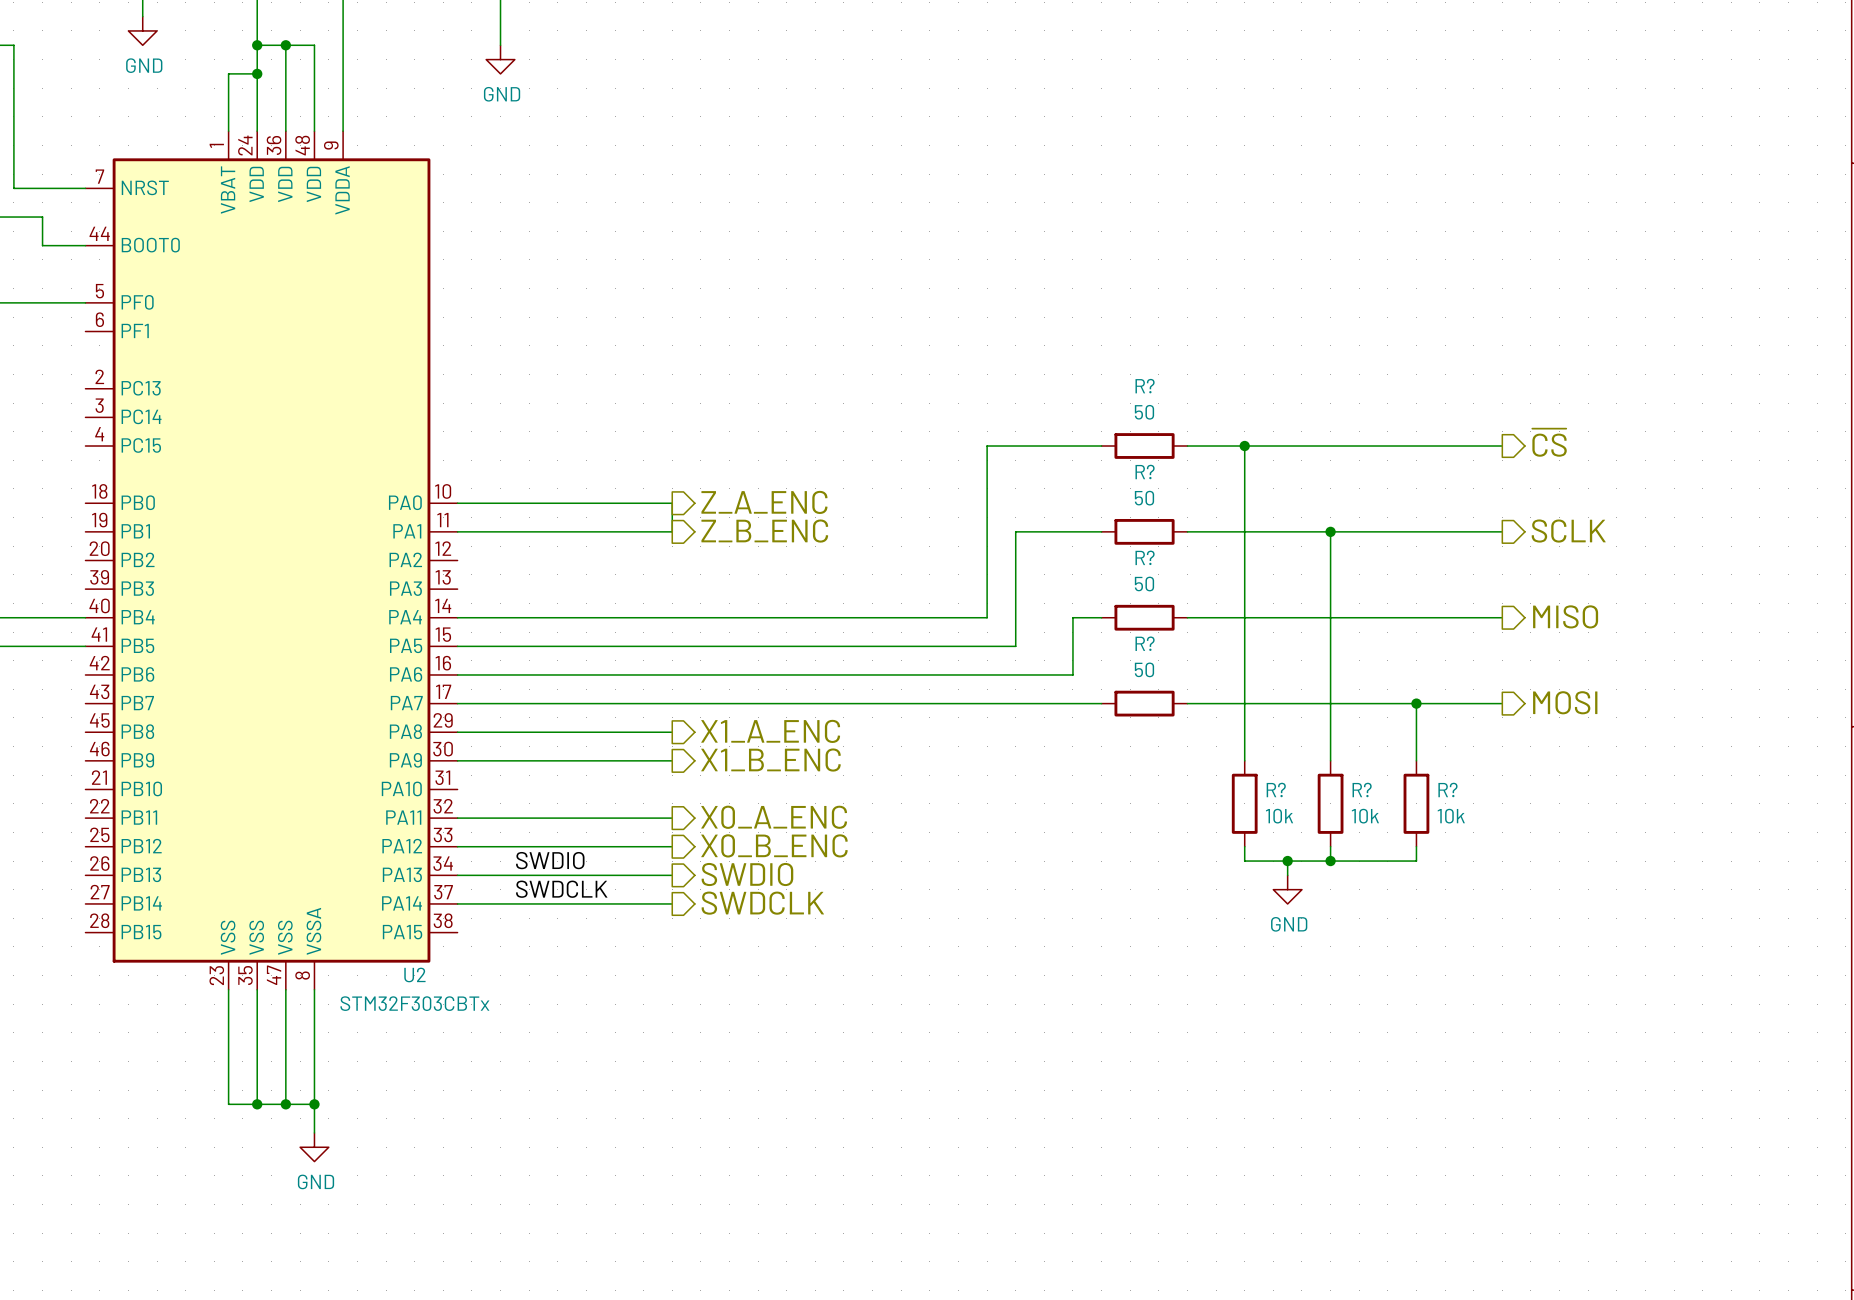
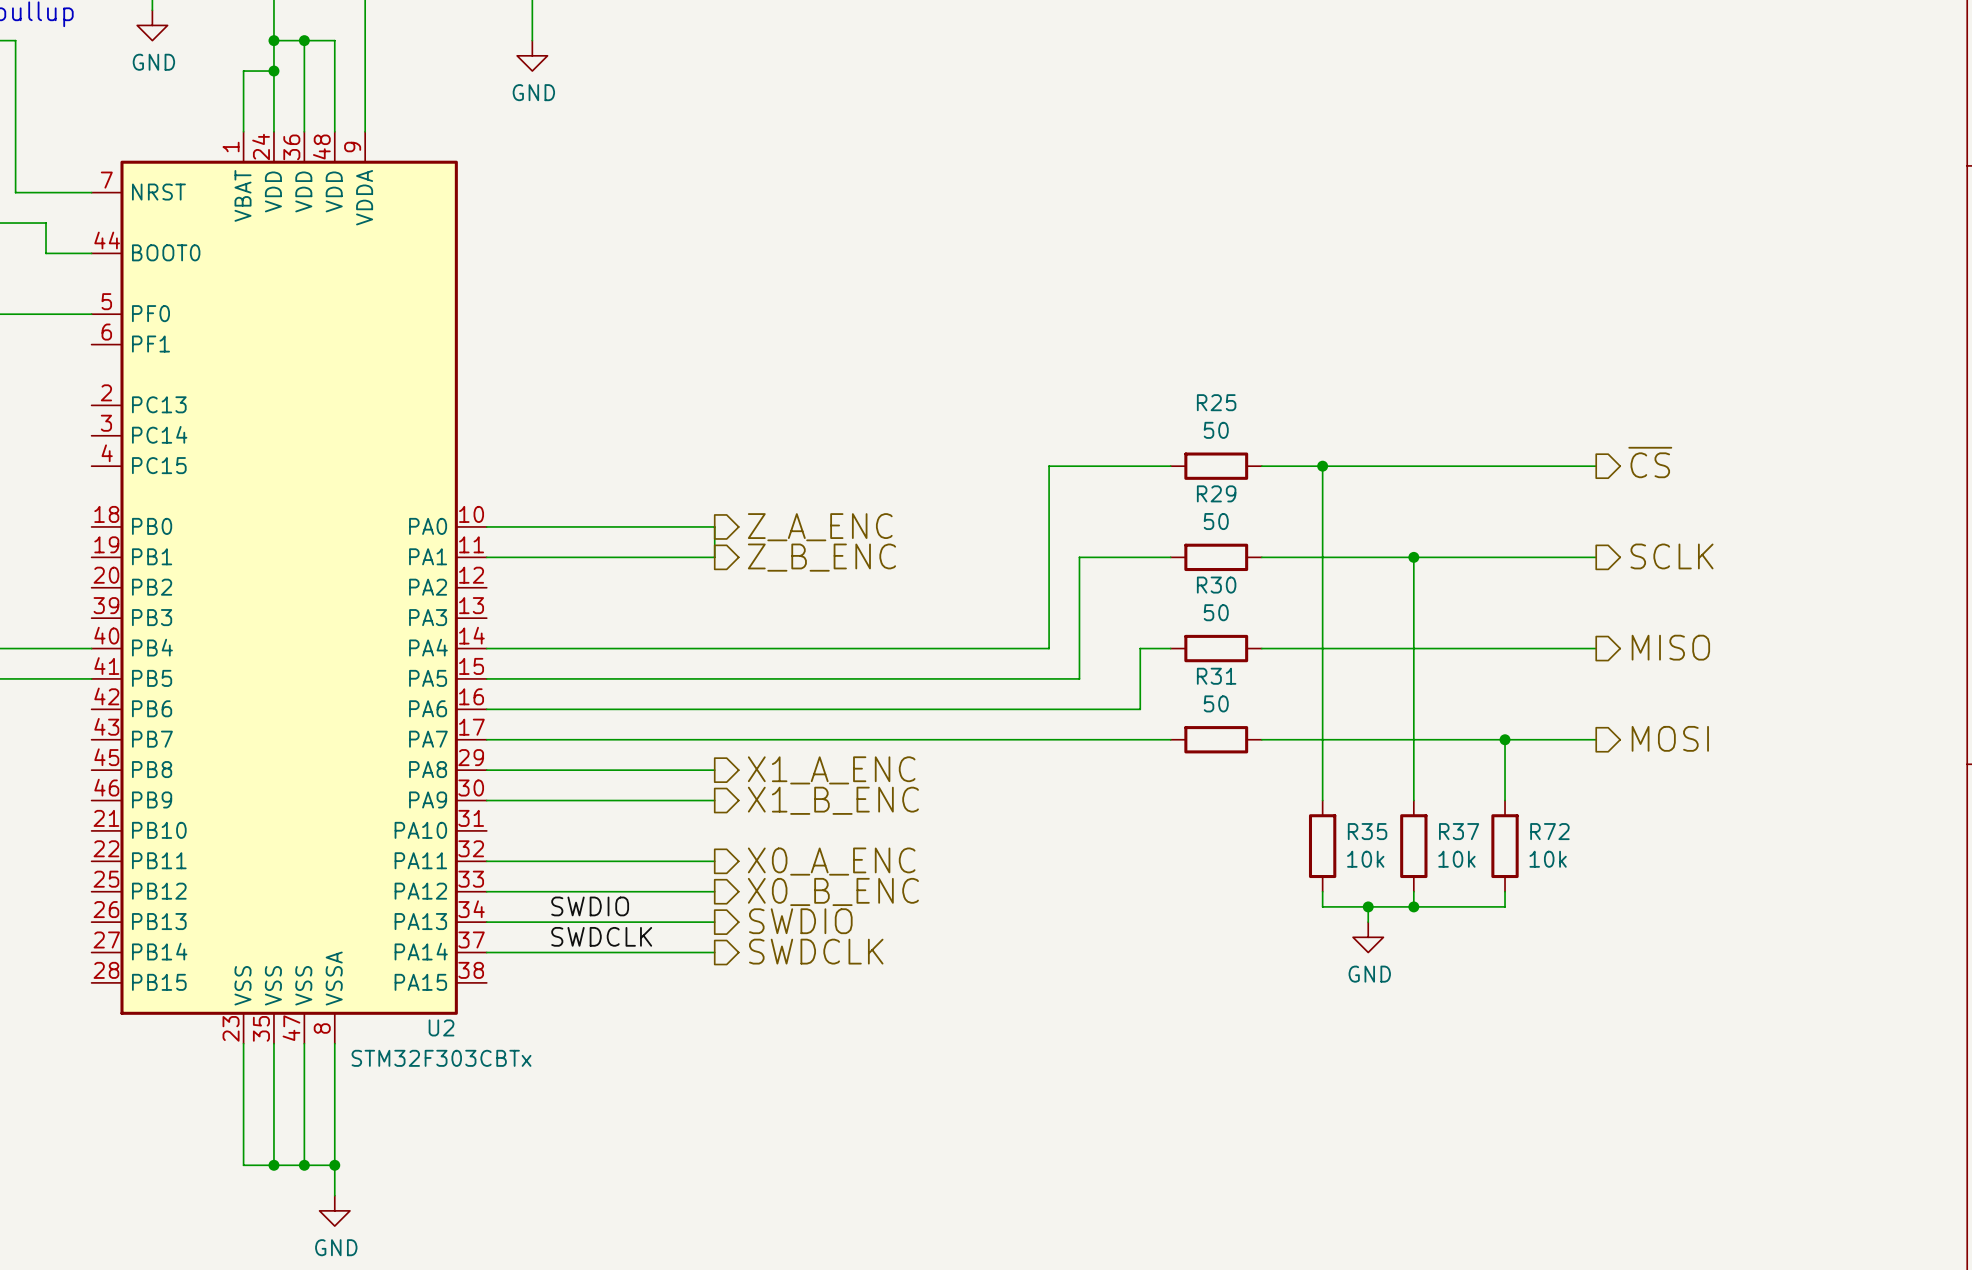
R? name: R? (1145, 386) -> R25 (1216, 402)
R? name: R? (1145, 471) -> R29 (1216, 493)
R? name: R? (1145, 557) -> R30 (1216, 585)
R? name: R? (1145, 643) -> R31 (1216, 676)
R? name: R? (1276, 789) -> R35 (1367, 831)
R? name: R? (1362, 789) -> R37 (1459, 831)
R? name: R? (1447, 789) -> R72 (1549, 831)

